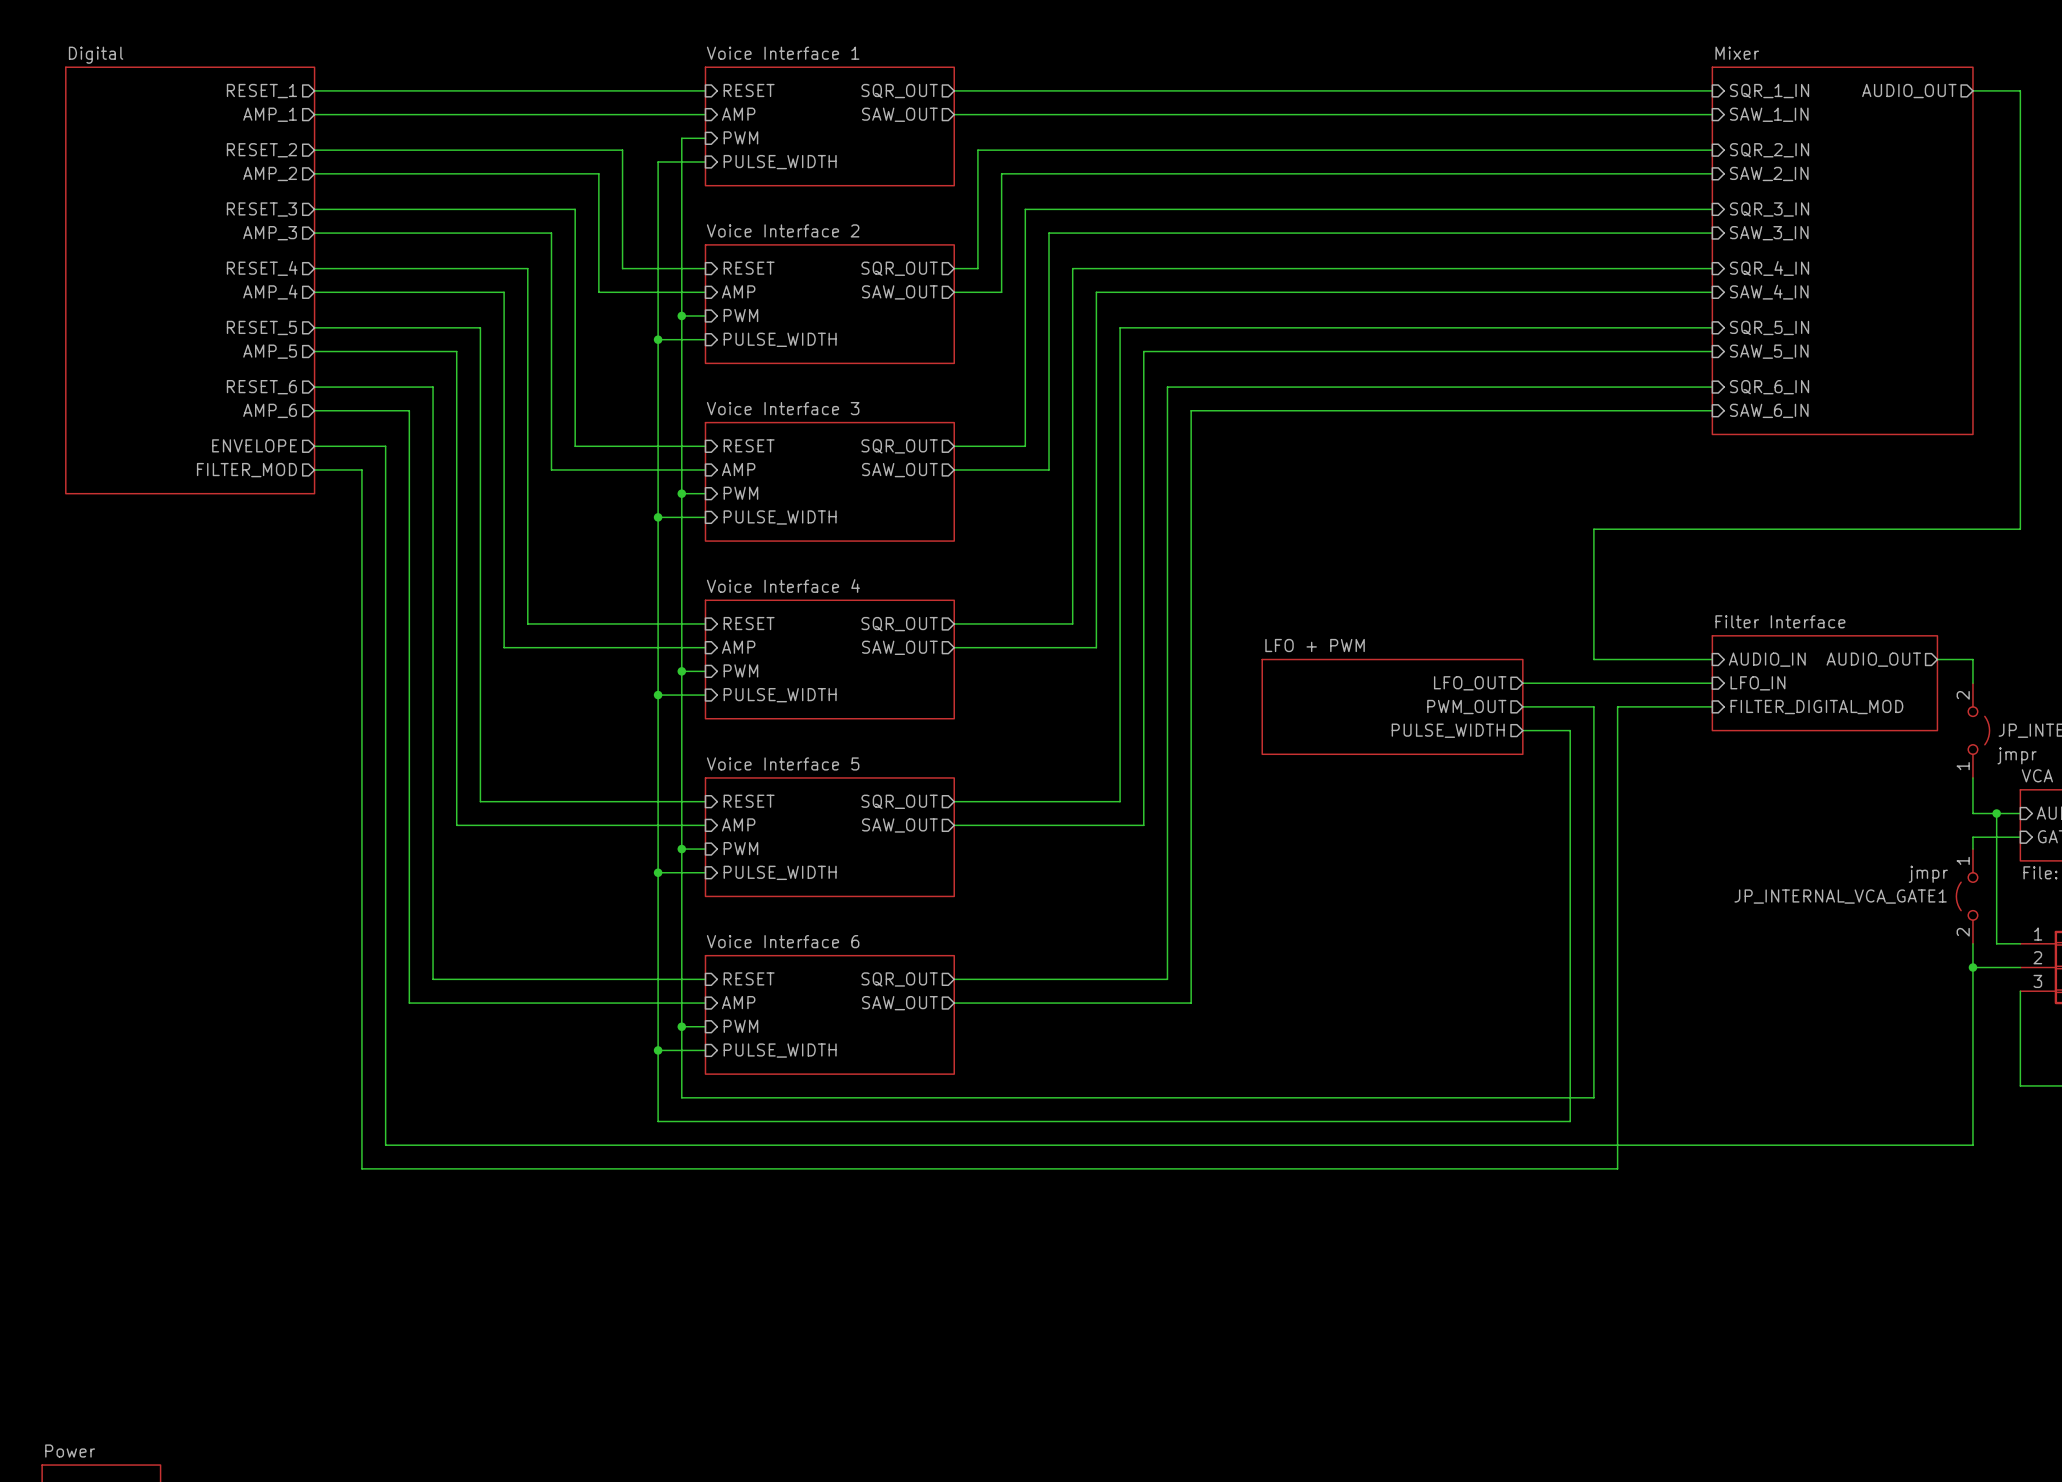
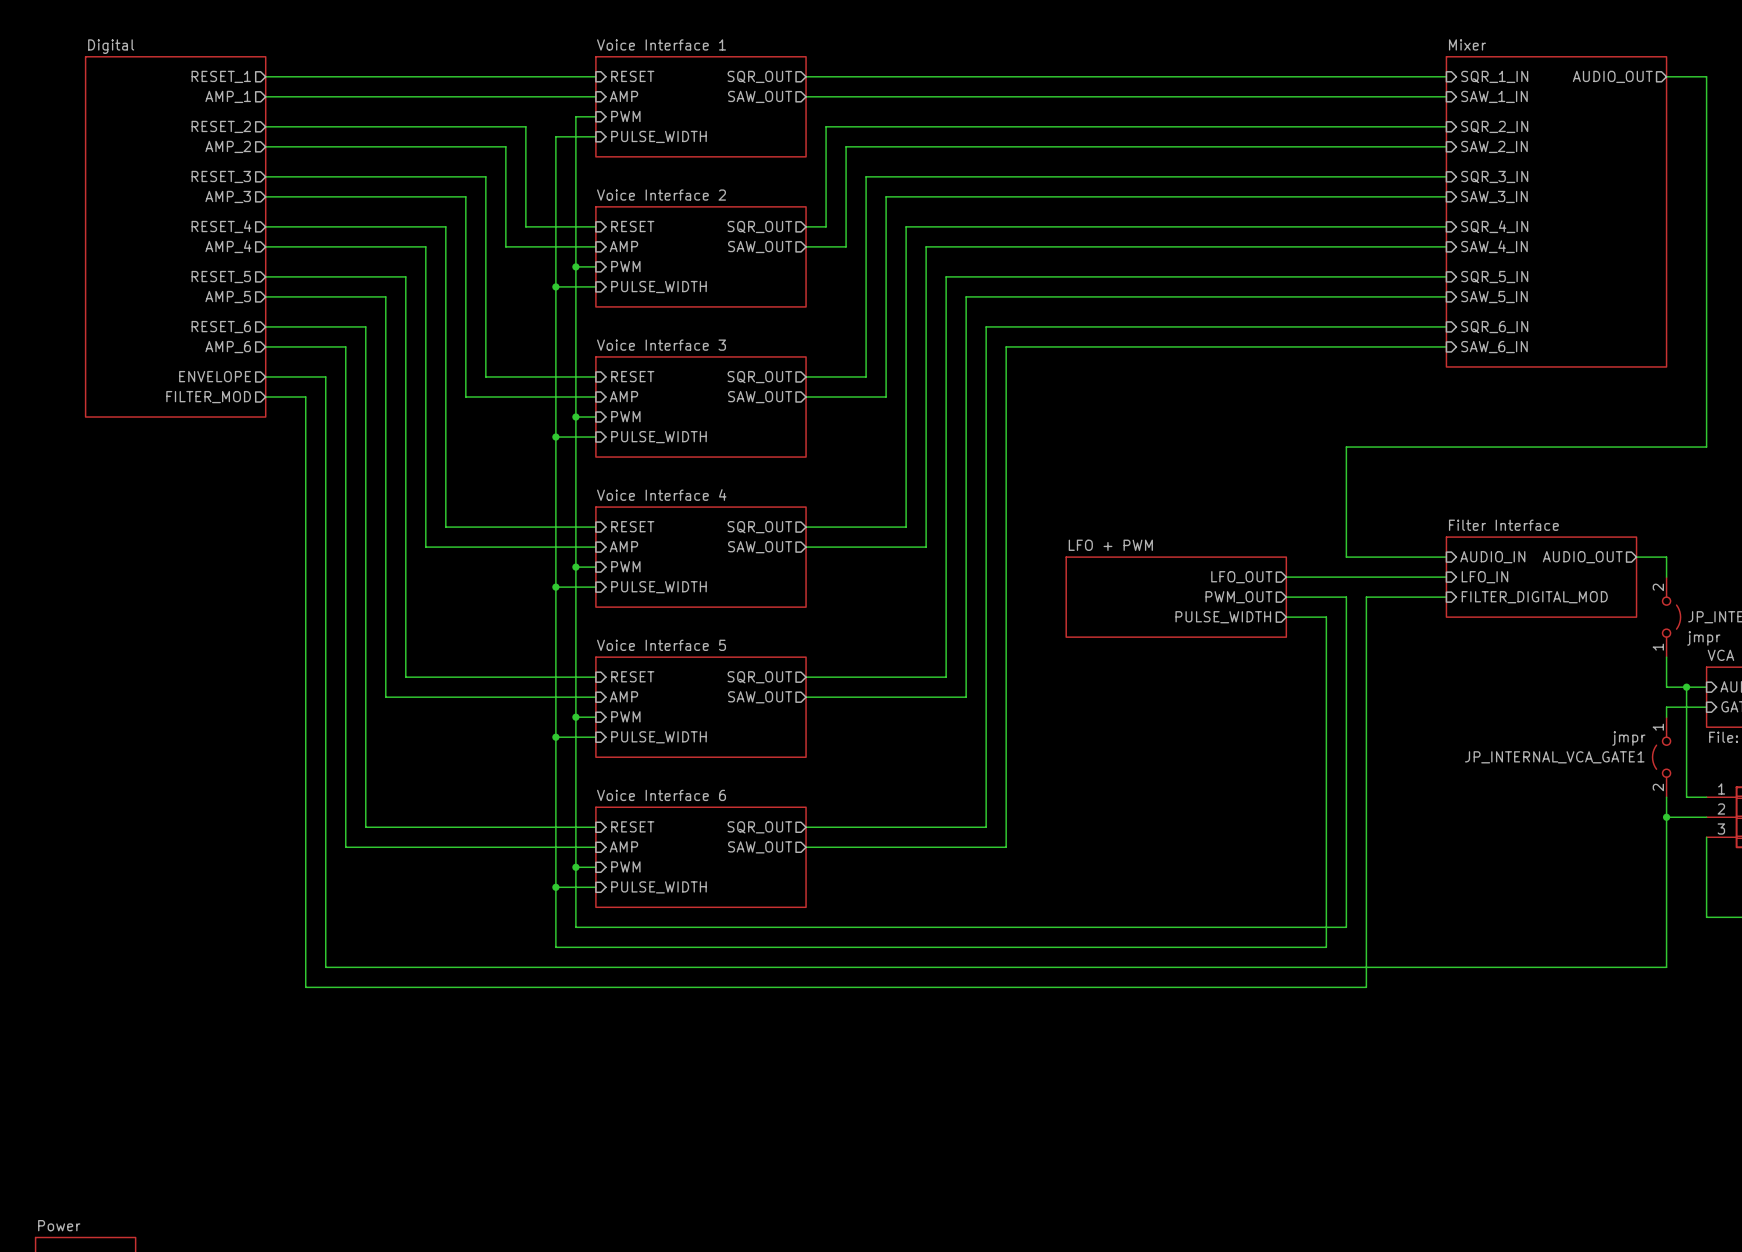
sheet Digital: (190, 280) -> none
sheet Digital: none -> (175, 236)

